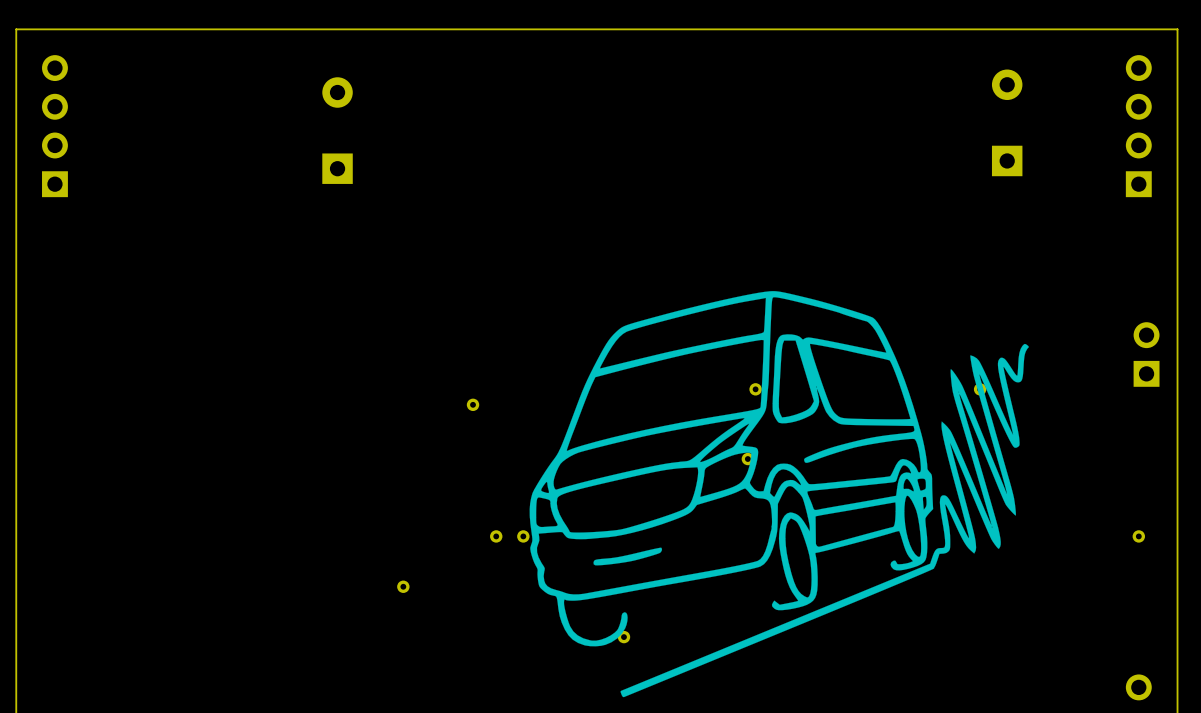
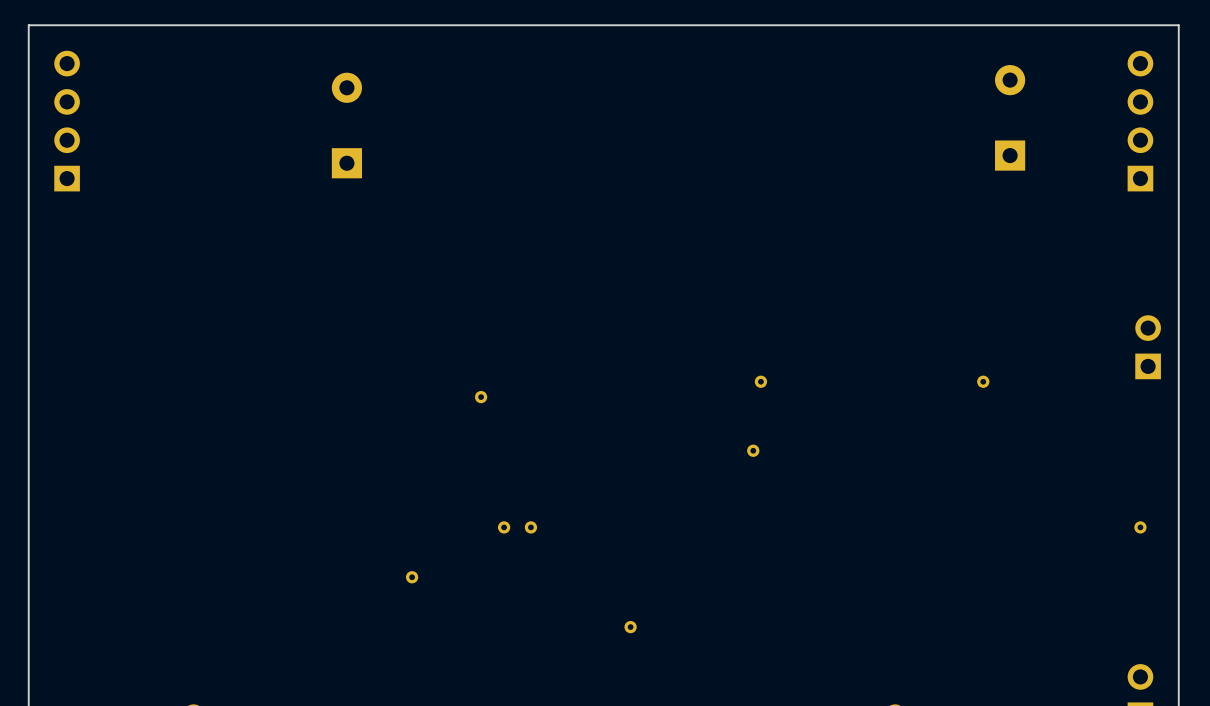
drawing: [529, 291, 1029, 698] -> none

